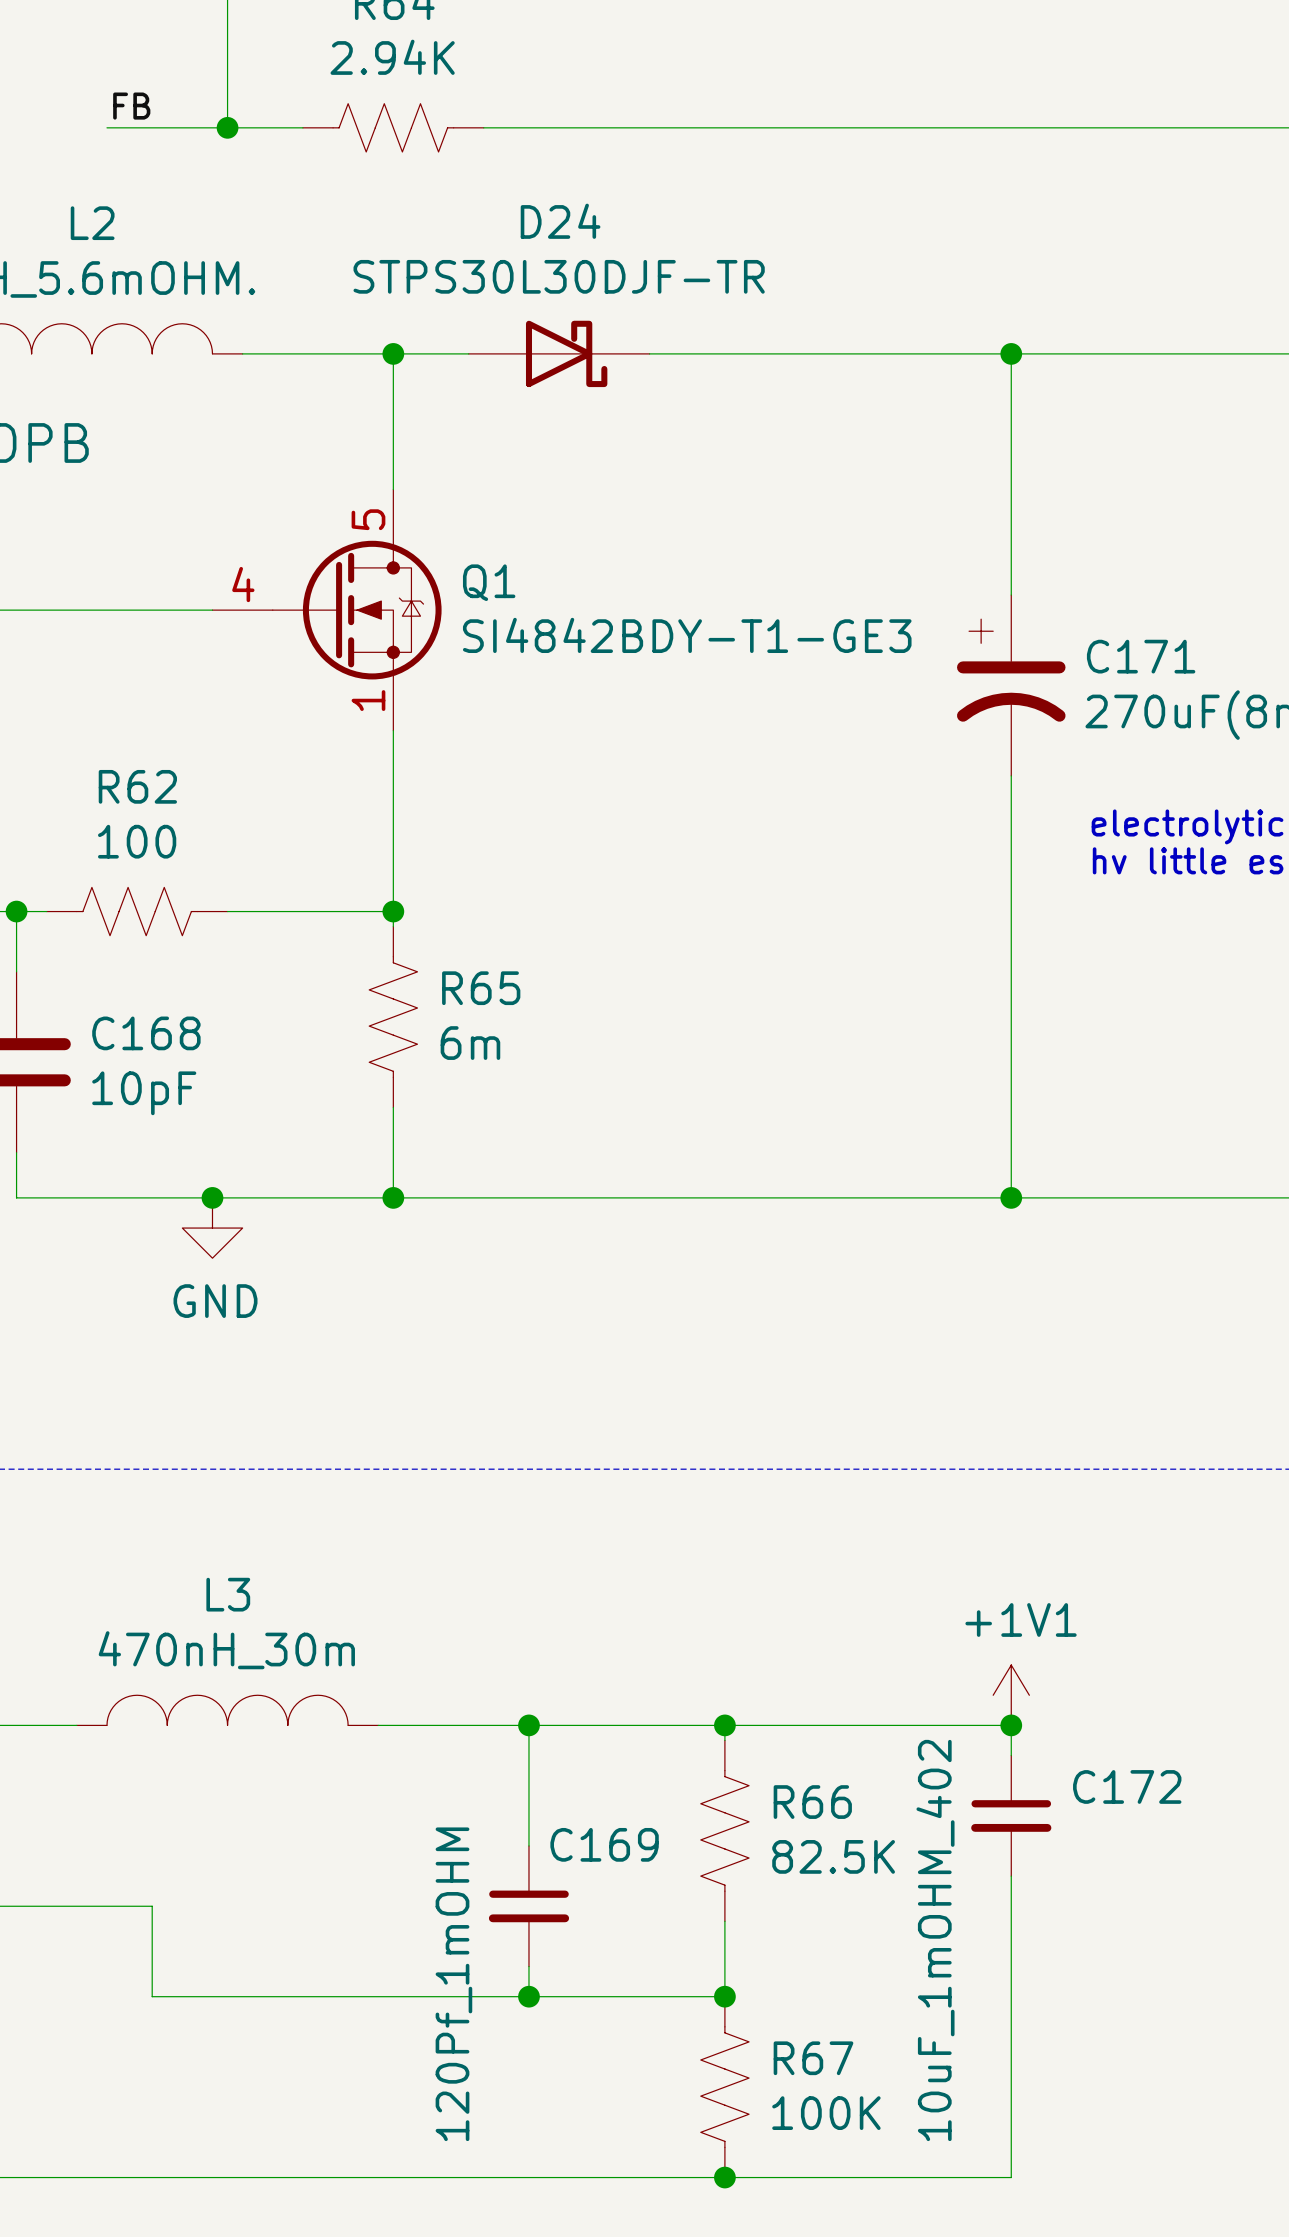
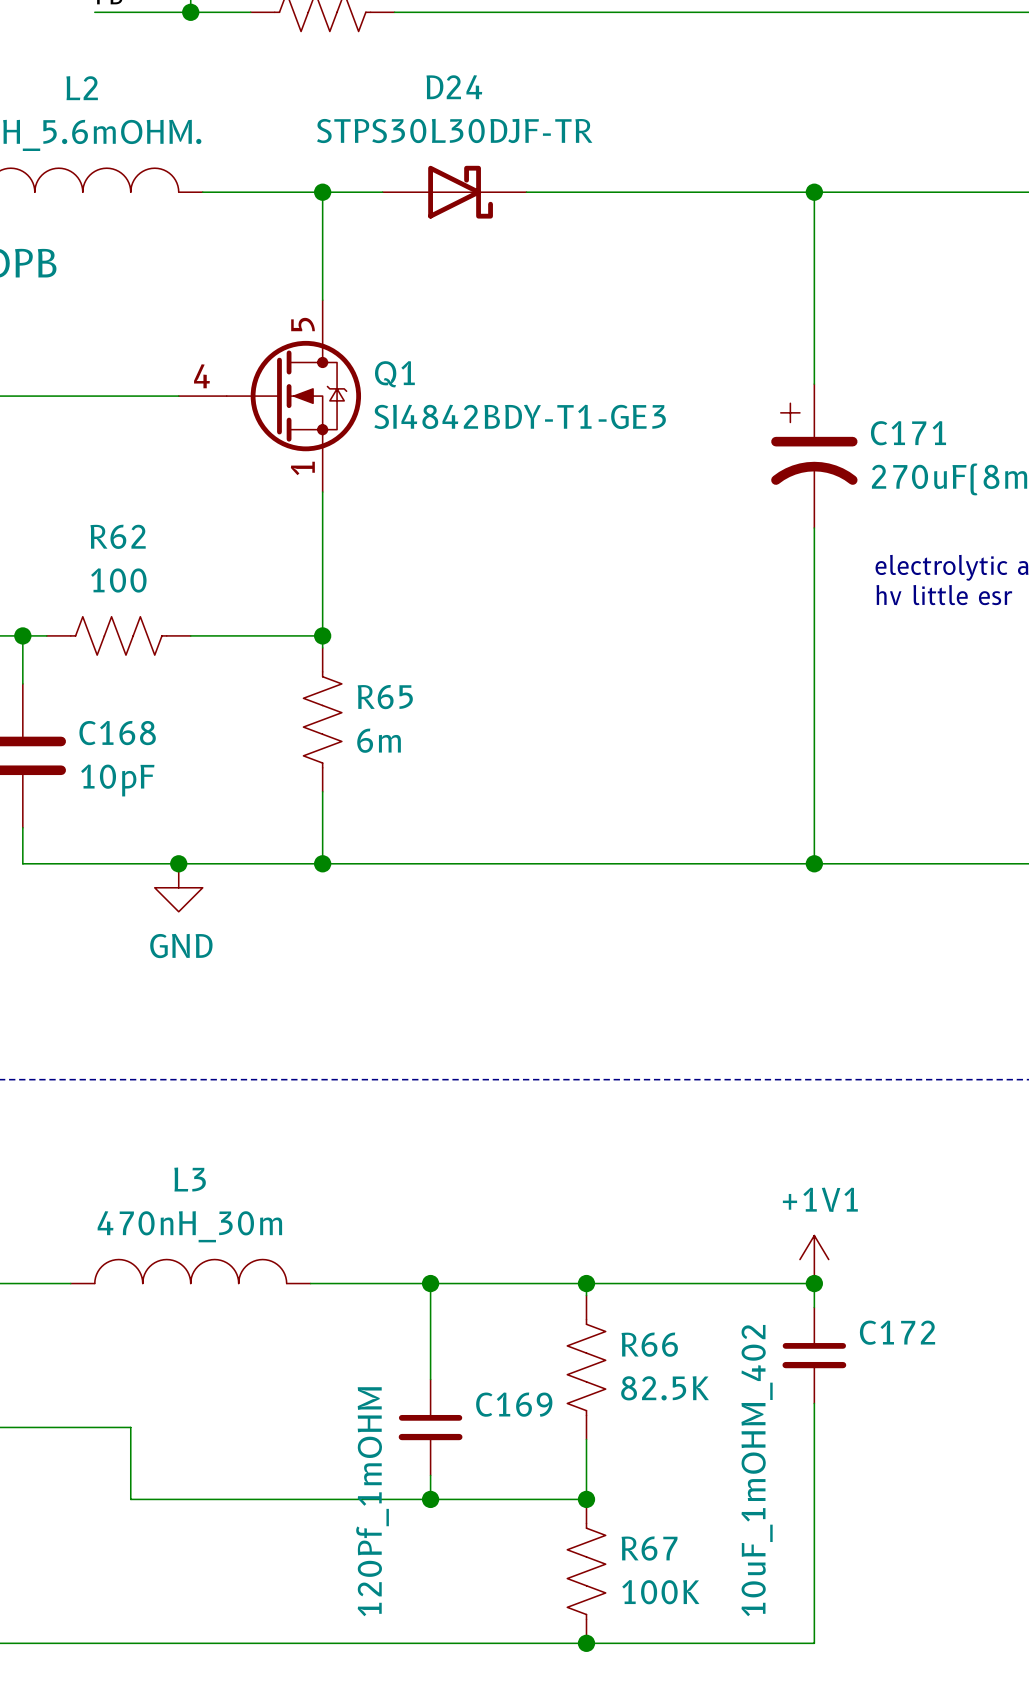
C169 name position: C169 (604, 1844) -> C169 (514, 1404)

